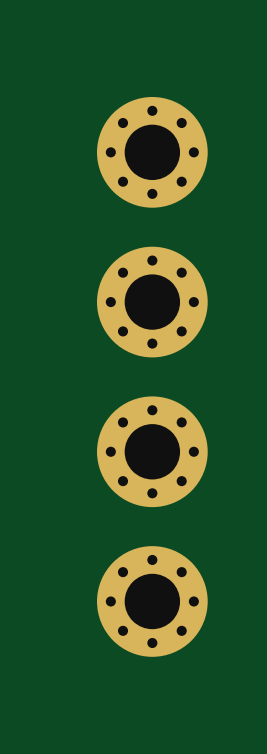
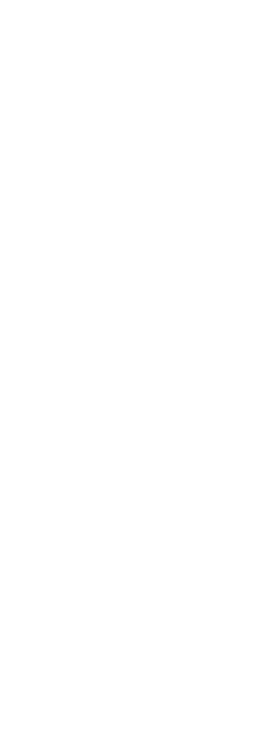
part: (152, 152) -> none
part: (152, 302) -> none
part: (152, 451) -> none
part: (152, 601) -> none

